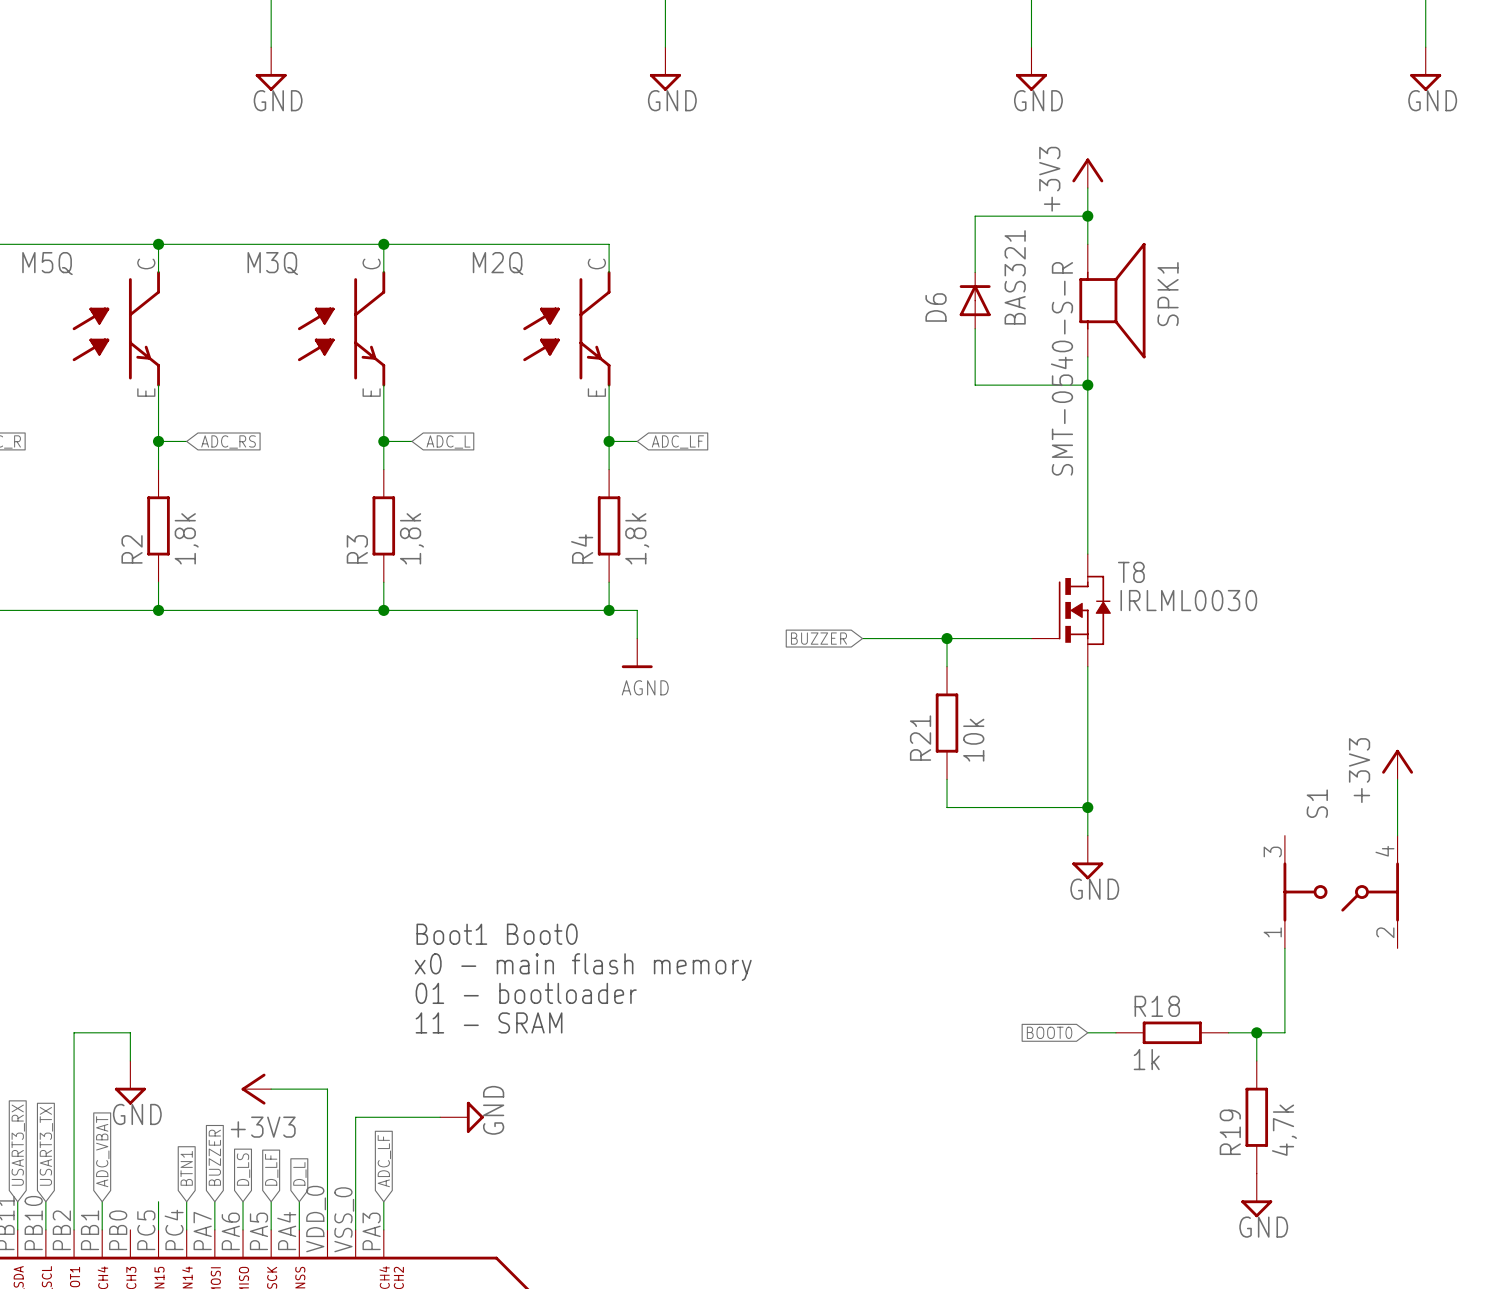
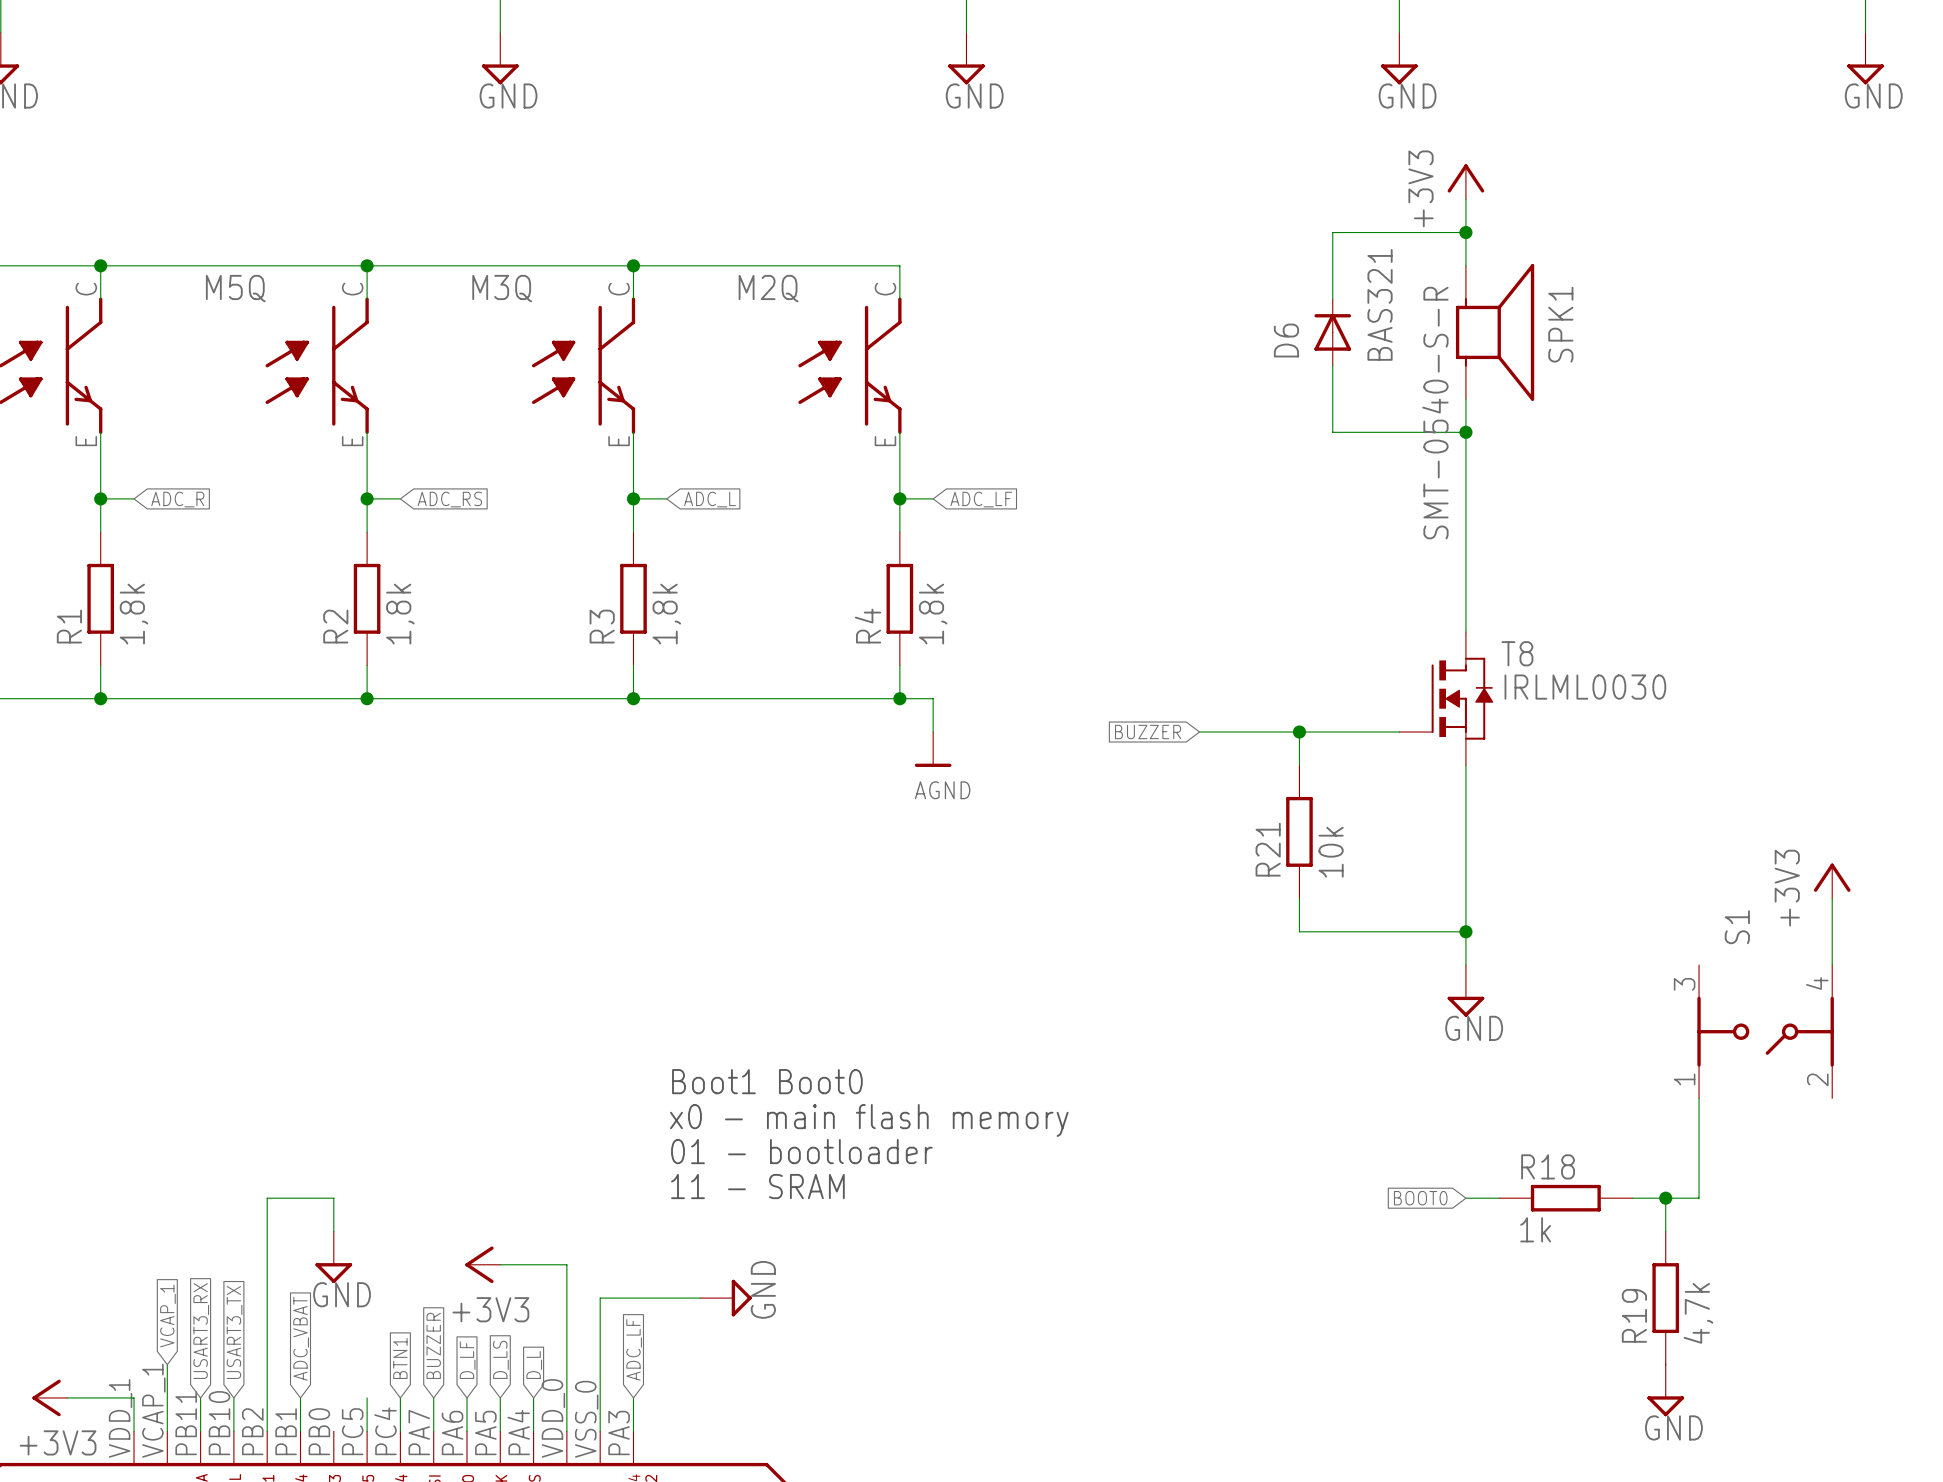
global label: D_LS (243, 1169) -> D_LF (467, 1360)
global label: D_LF (271, 1169) -> D_LS (500, 1359)

